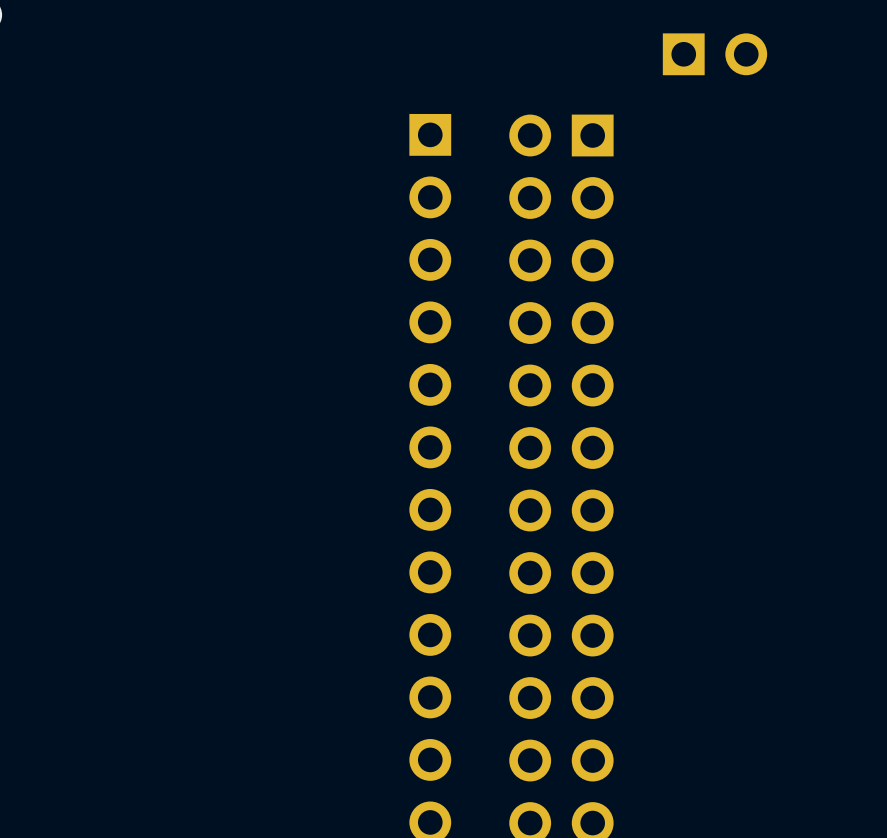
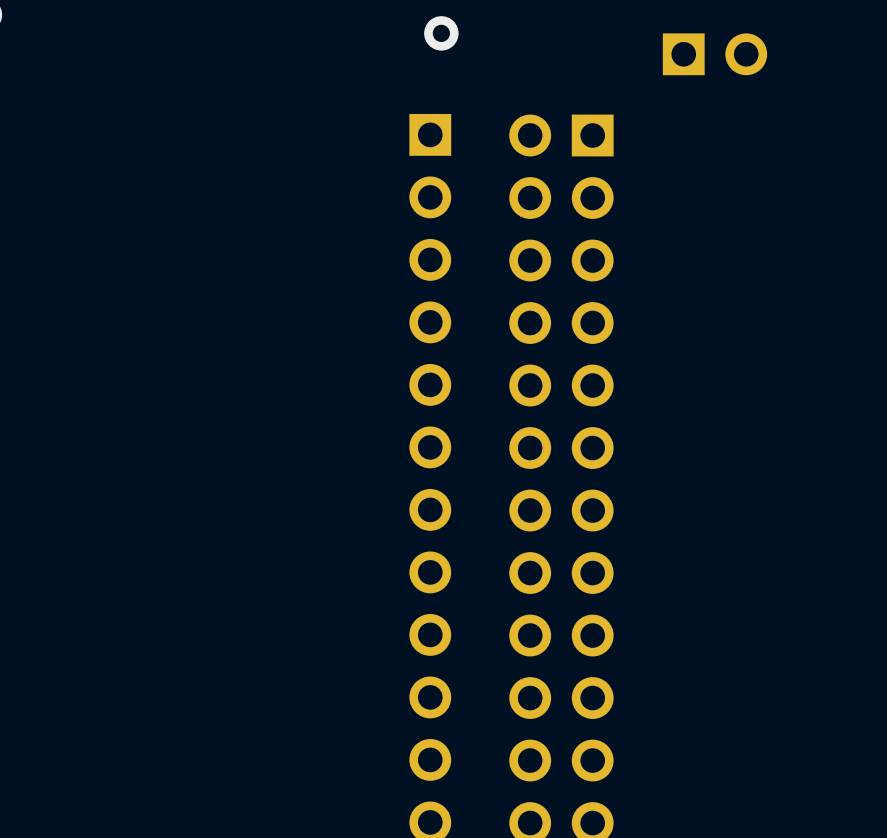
via: none -> (441, 33)

